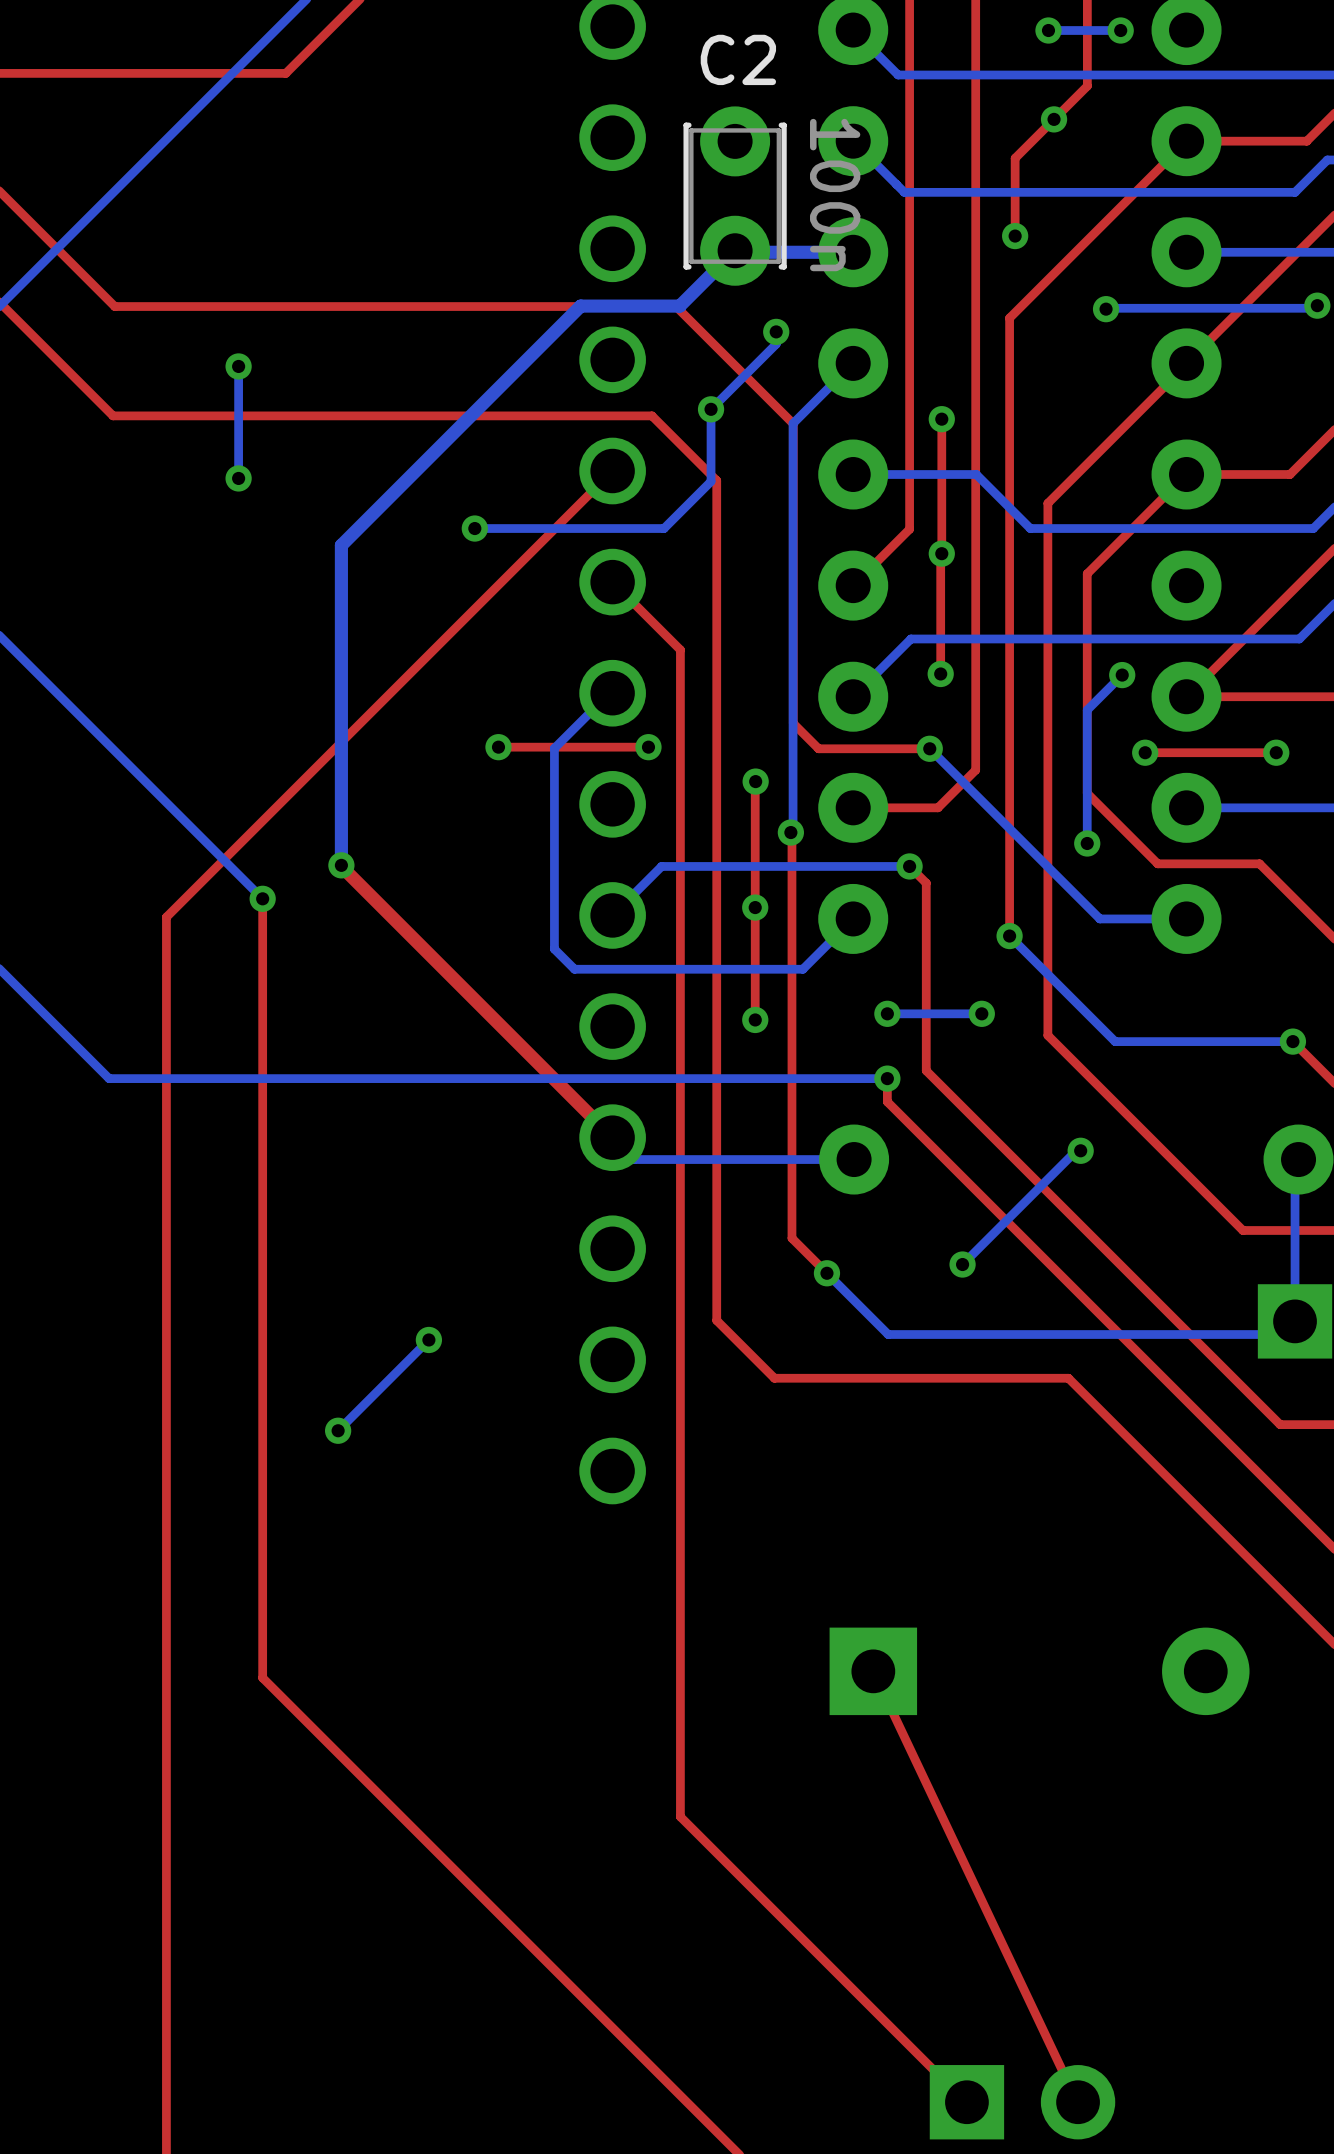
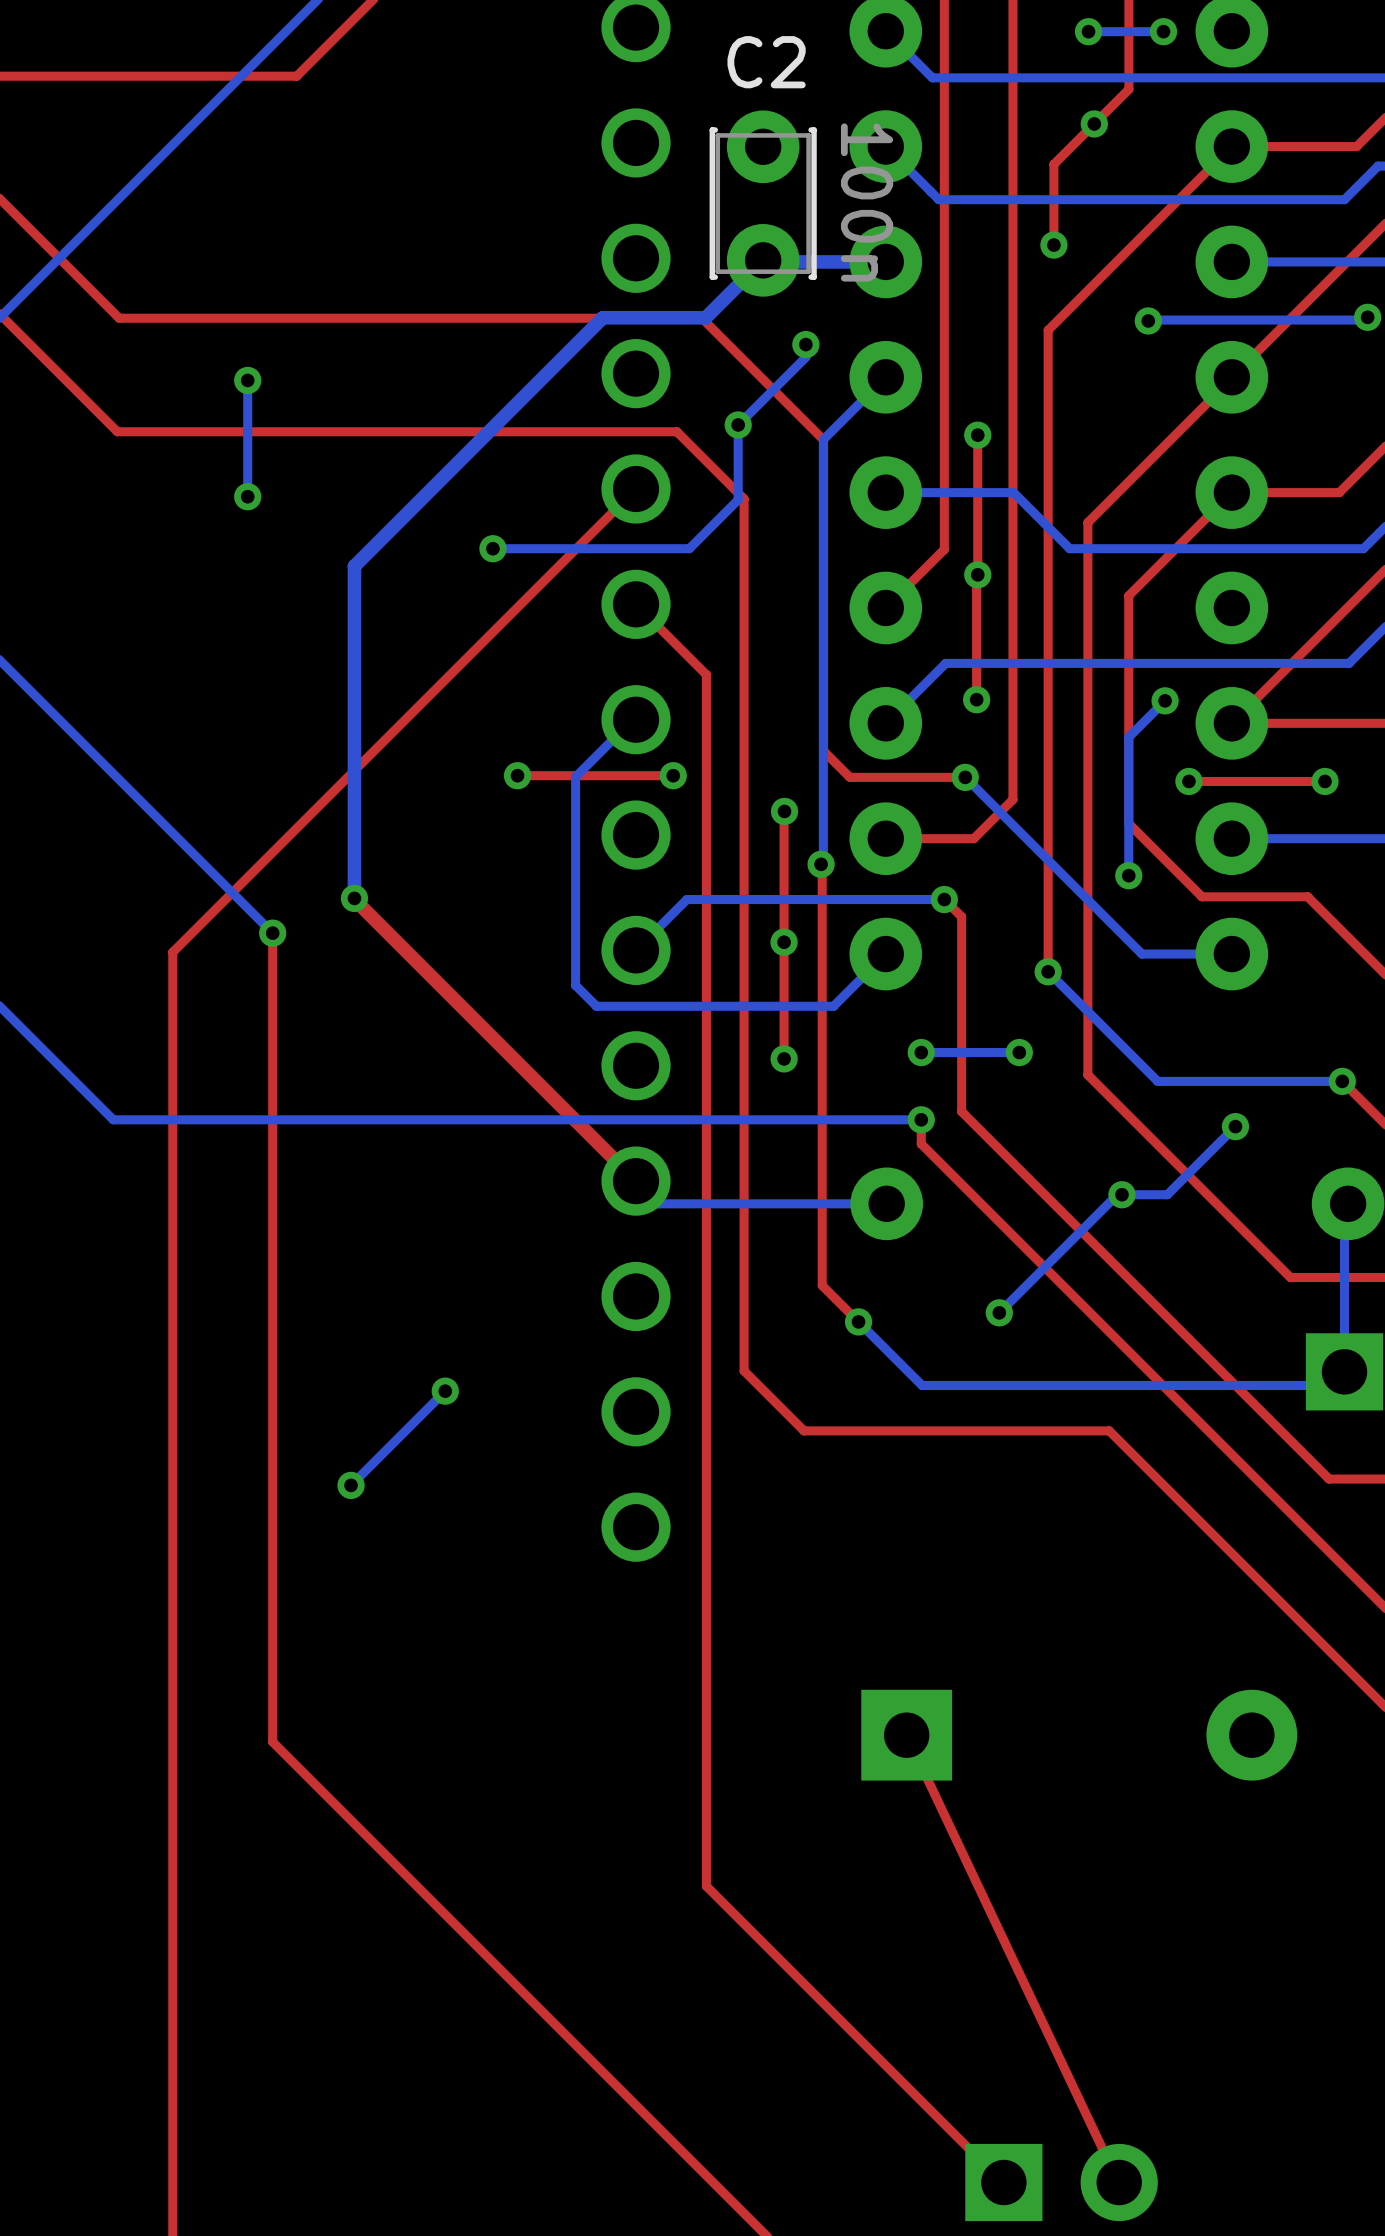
bottom track: none -> (1235, 1126) (1167, 1194) (1121, 1194)
via: none -> (1235, 1126)

